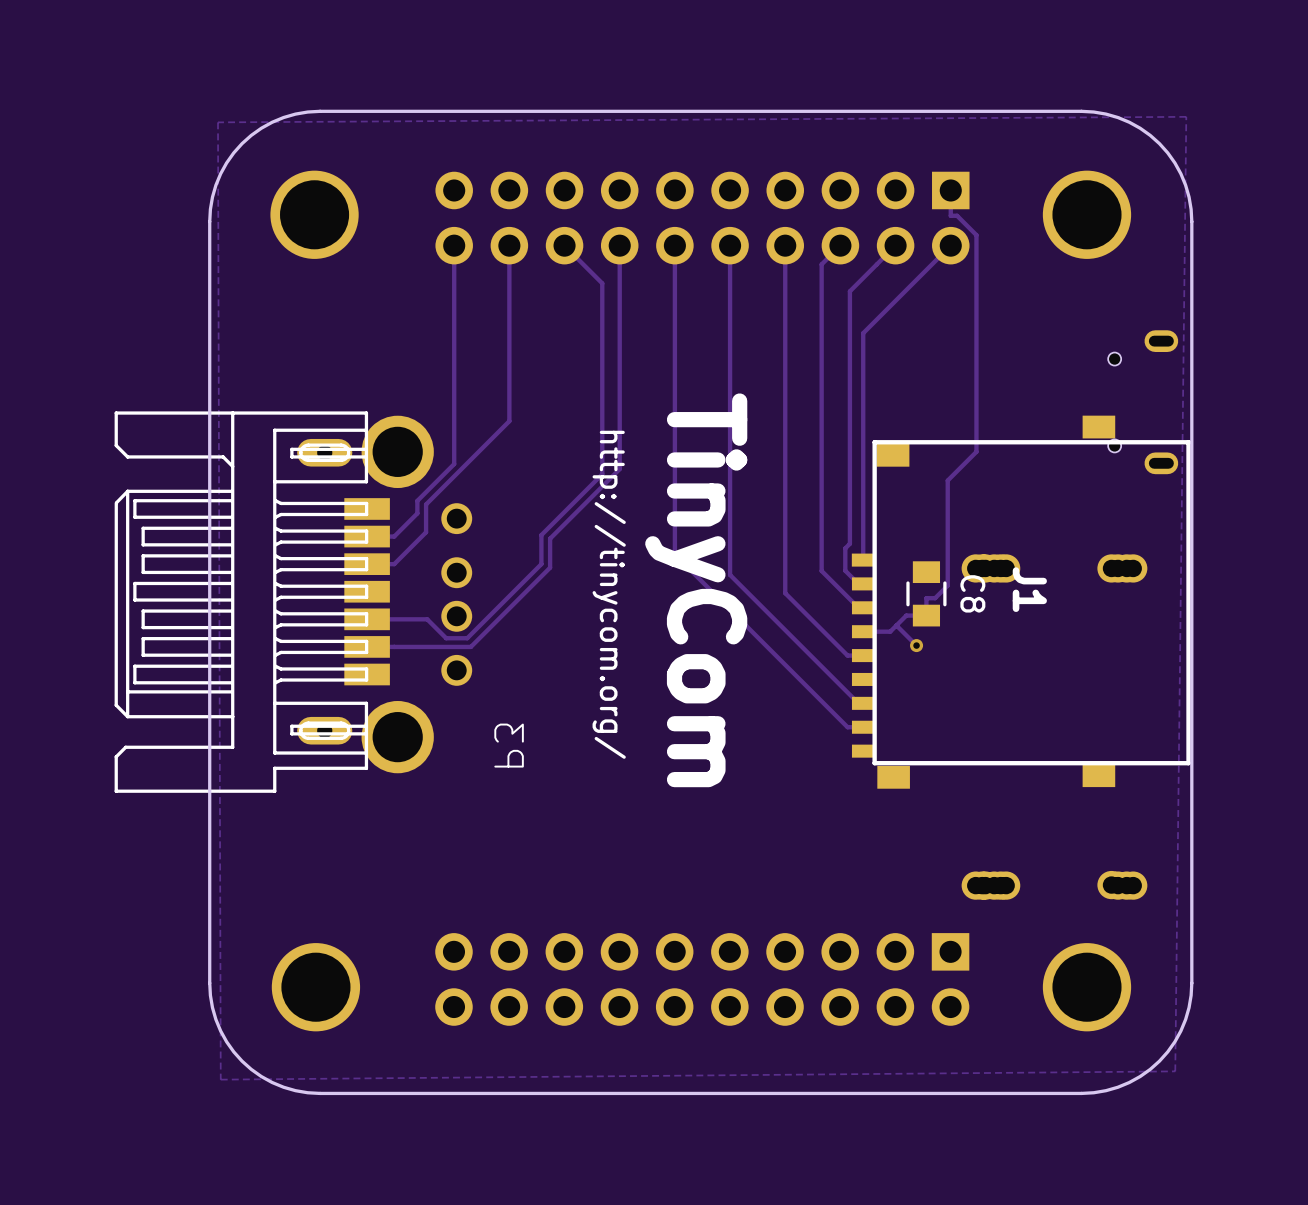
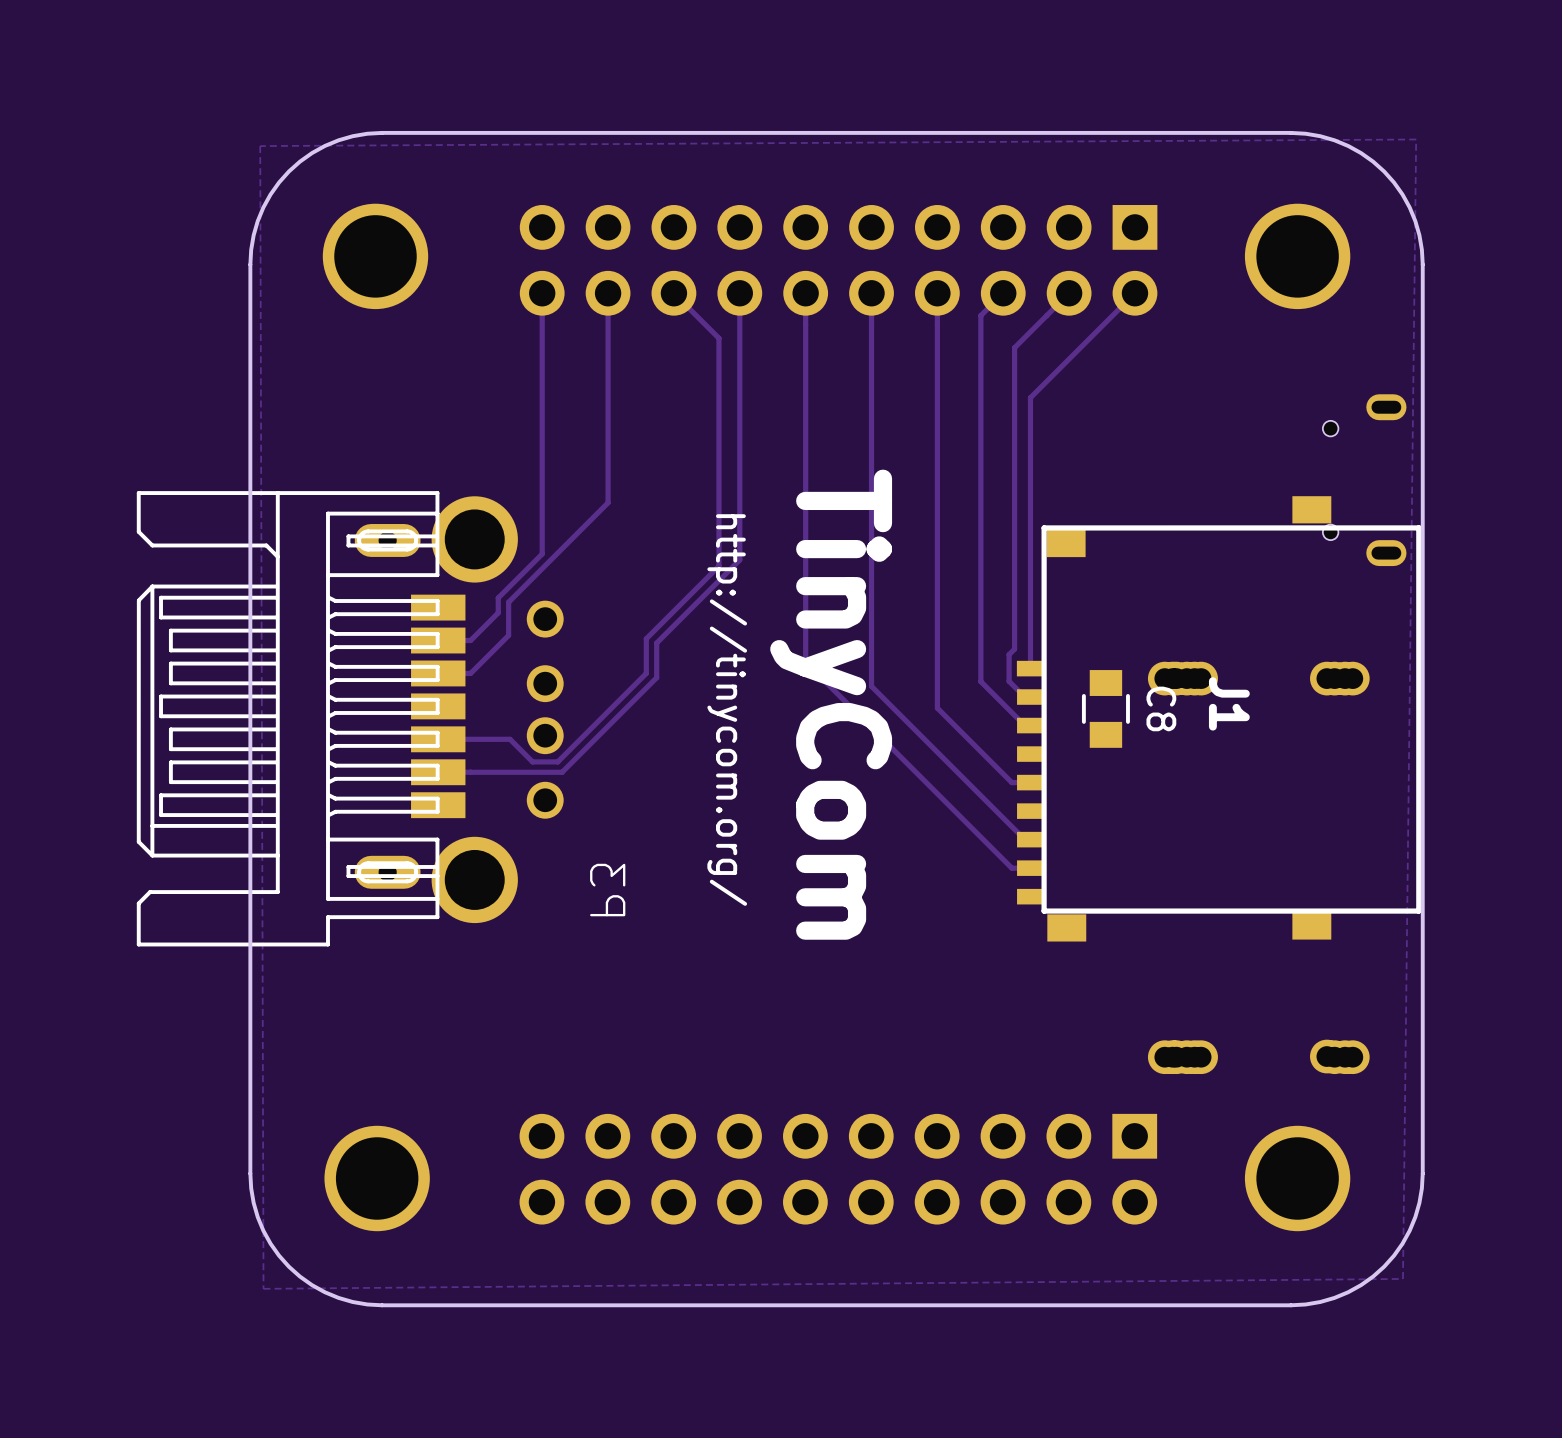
track: (950, 190) (950, 215) (957, 215) (976, 235) (976, 451) (947, 480) (947, 585) (935, 598) (926, 598) (926, 615) (906, 615) (896, 625) -> none
track: (896, 625) (916, 645) -> none
track: (896, 625) (890, 631) (863, 631) -> none
via: (916, 645) -> none

